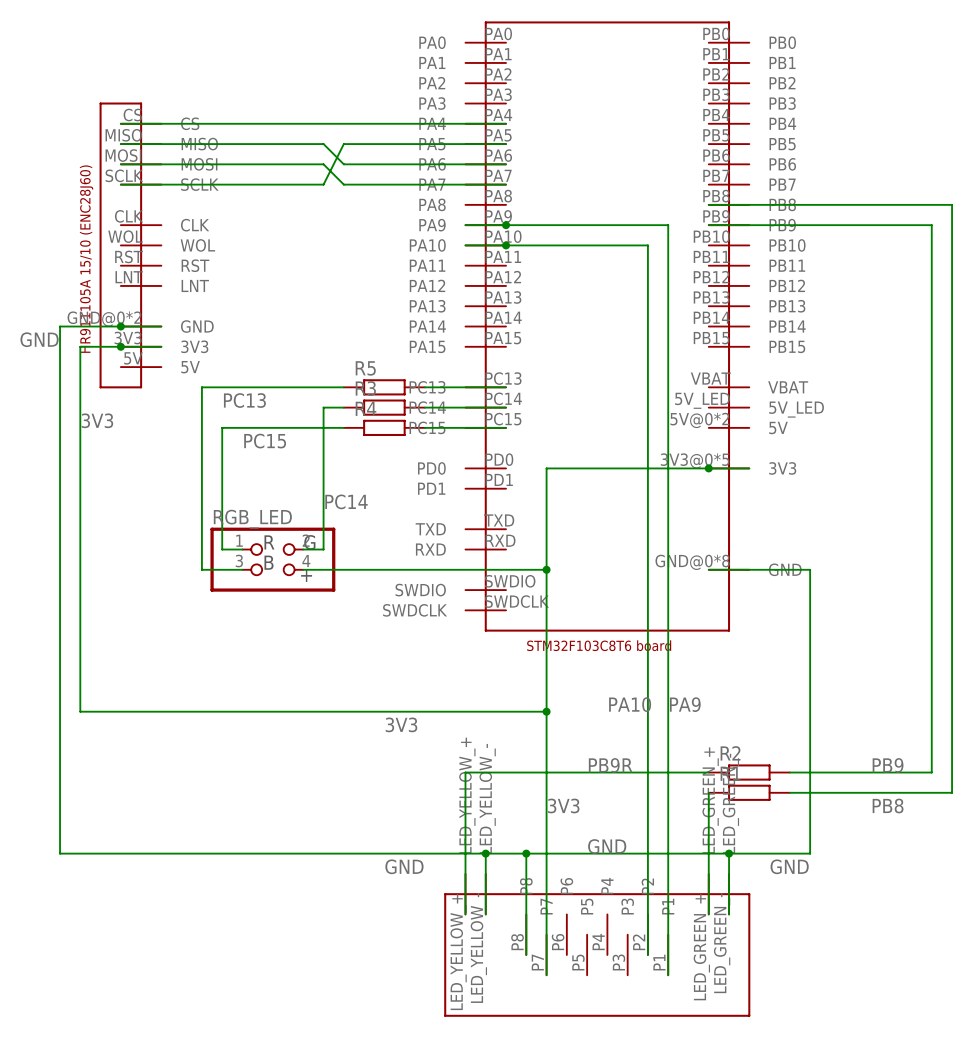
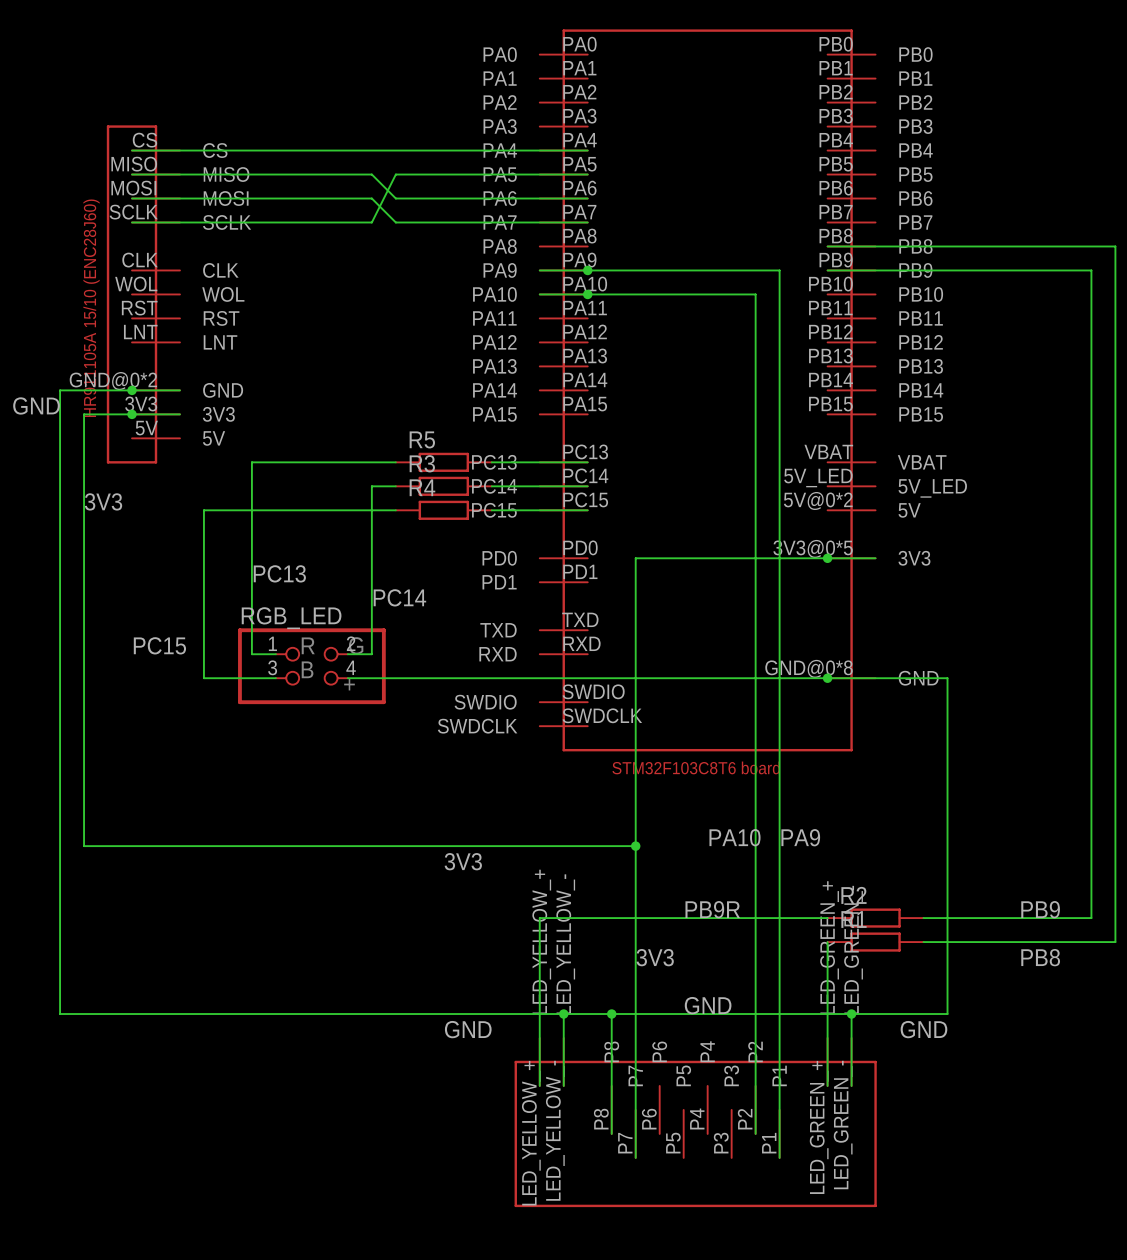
wire: (222, 387) (201, 387) (201, 569) -> (251, 462) (251, 510) (203, 510) (203, 678) (227, 678)
label position: PC13 (244, 400) -> PC13 (279, 573)
label position: PC15 (265, 441) -> PC15 (159, 645)
wire: none -> (635, 678) (827, 678)
junction: (546, 569) -> none
junction: none -> (827, 678)

